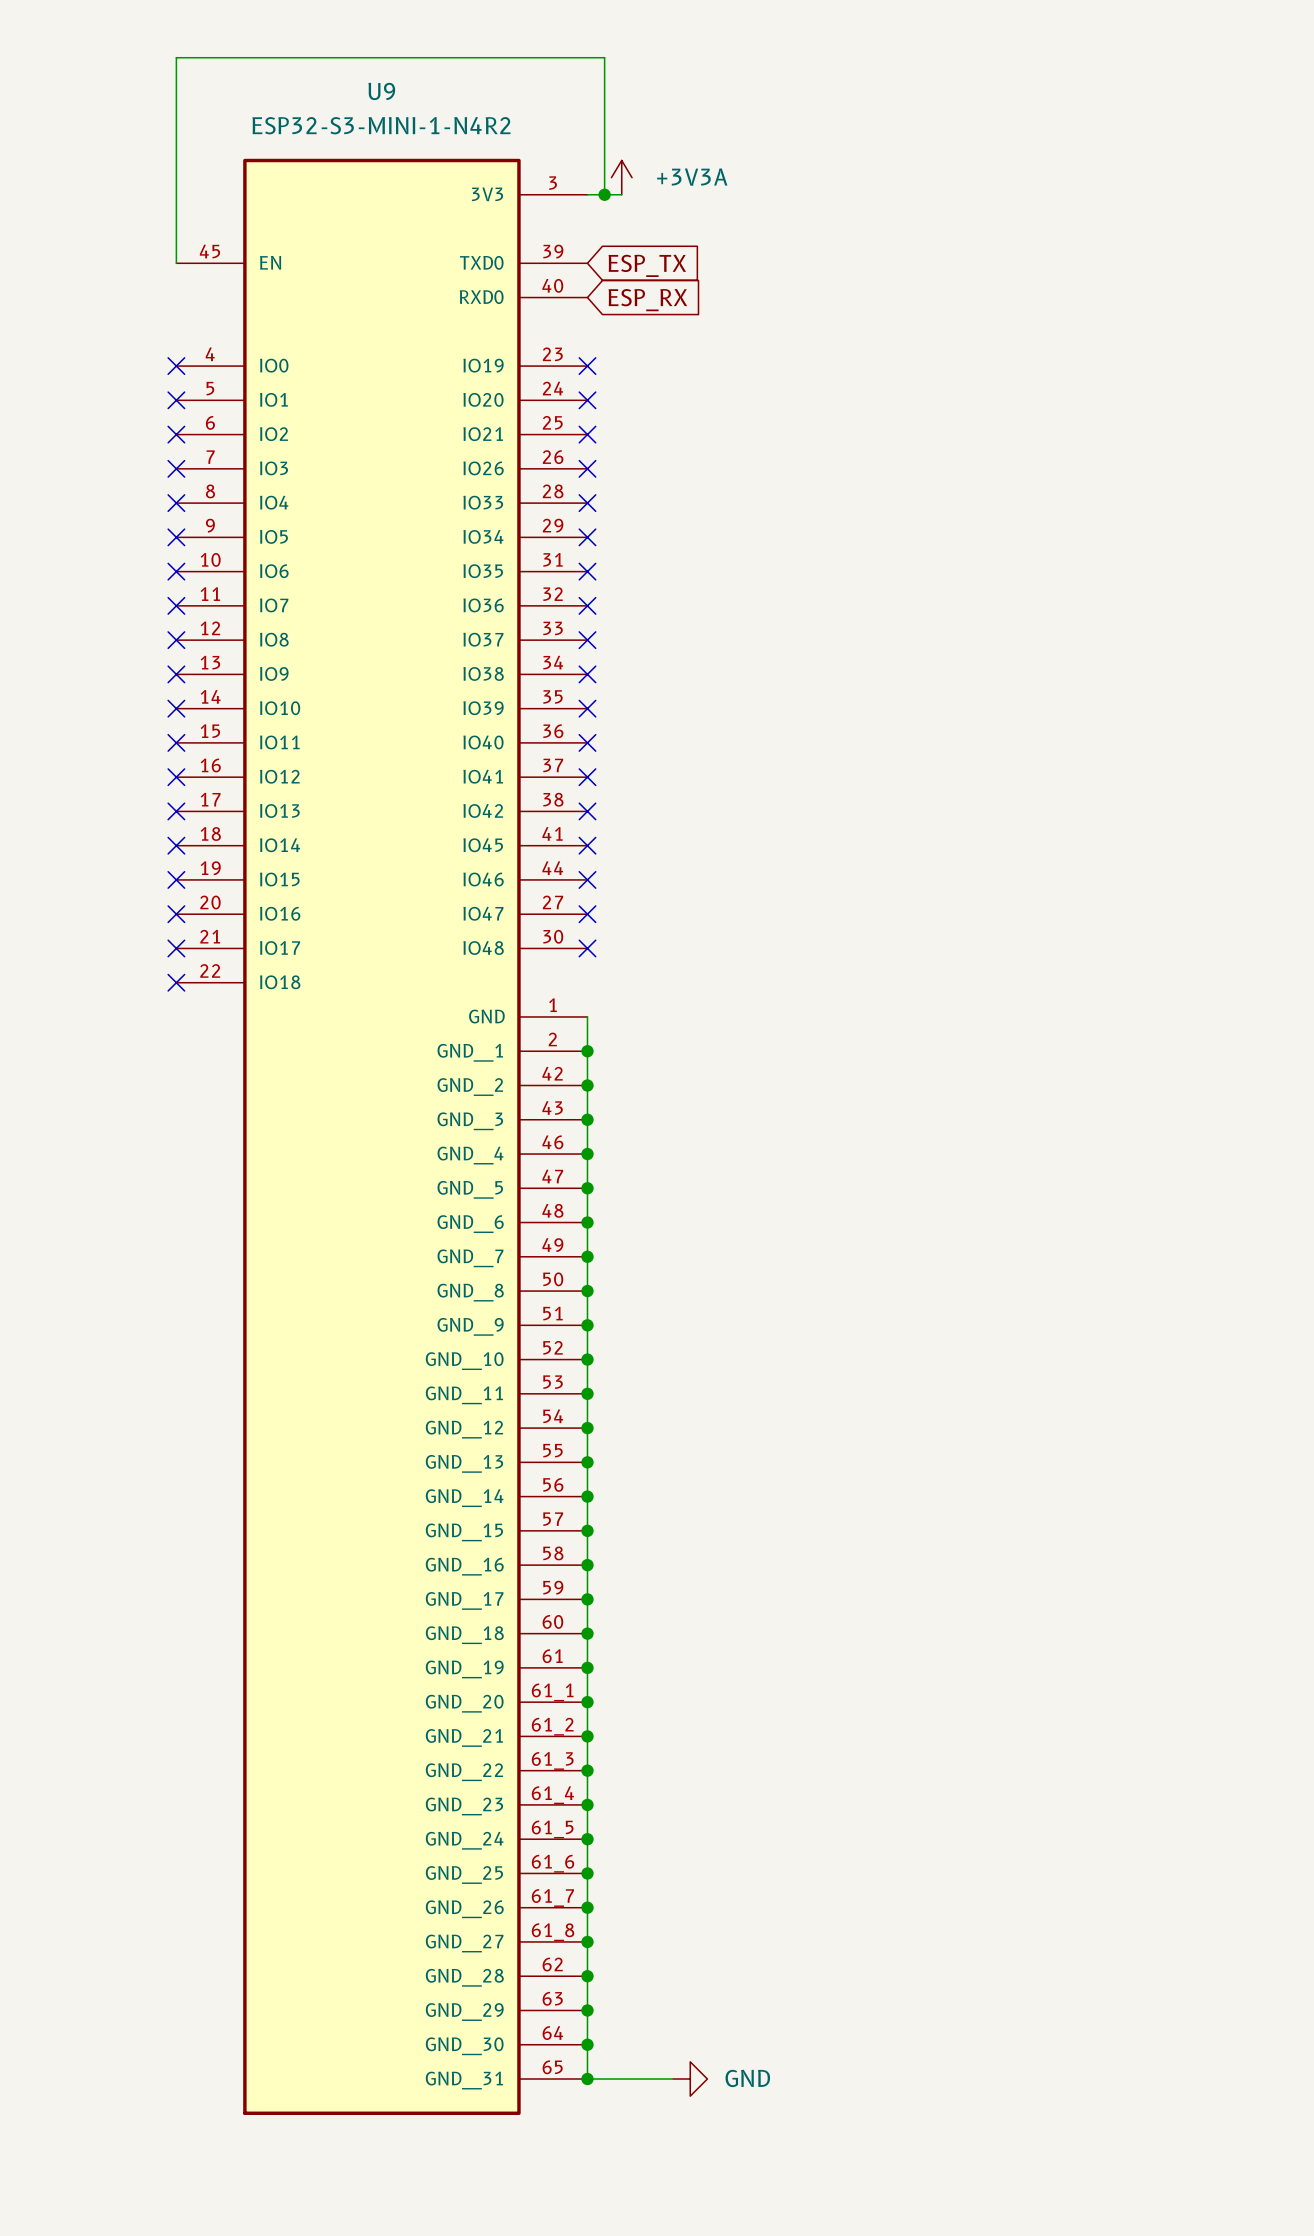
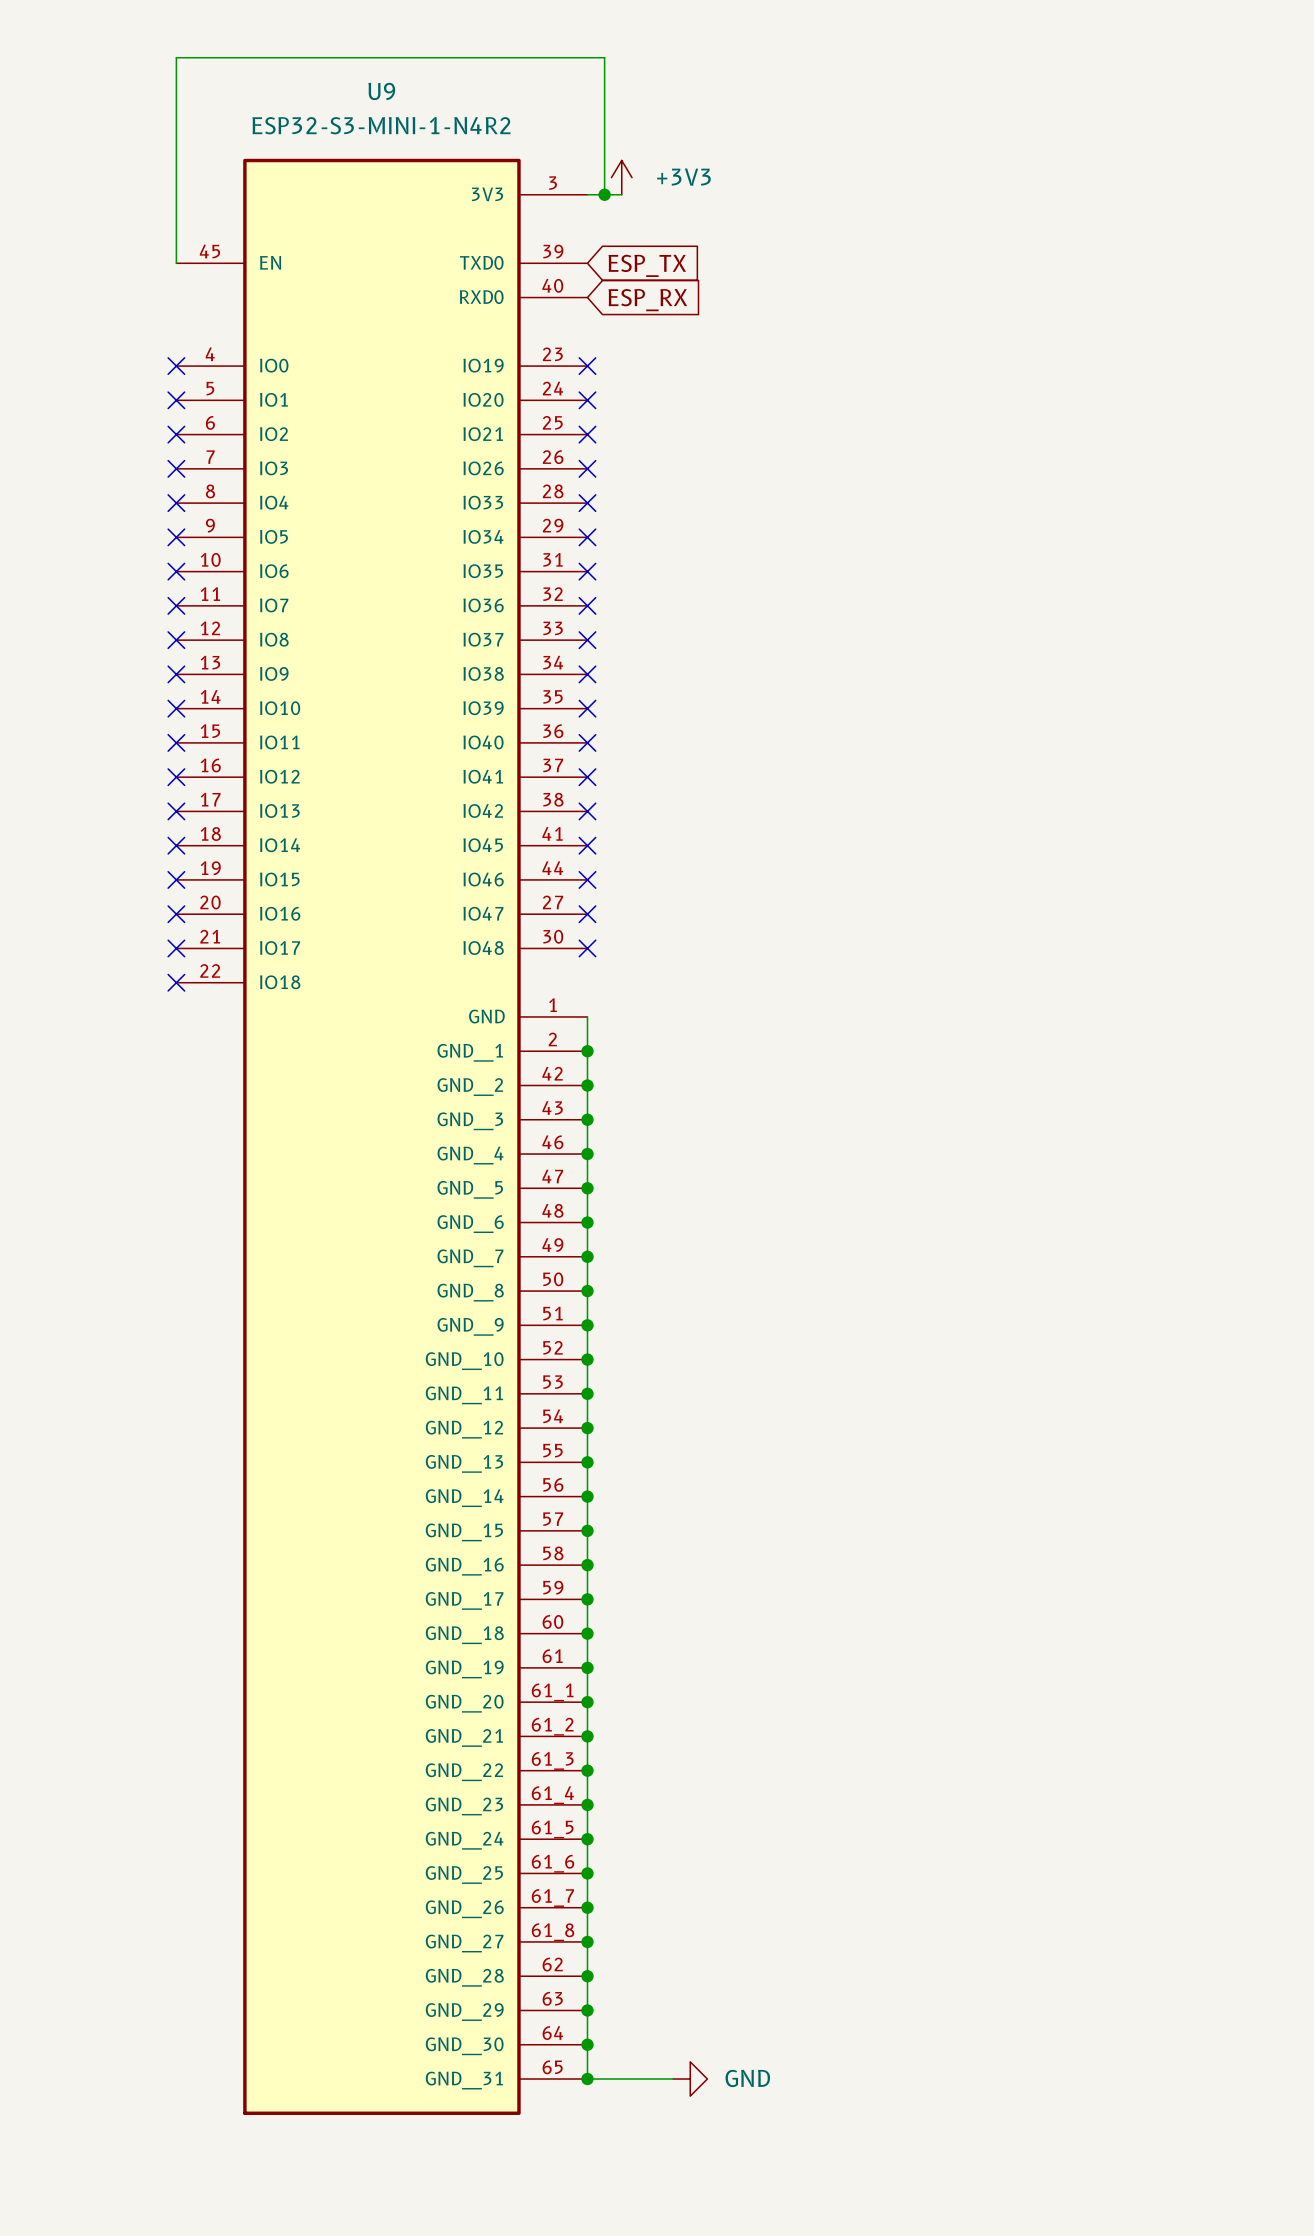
power symbol: +3V3A (621, 177) -> +3V3 (621, 177)

